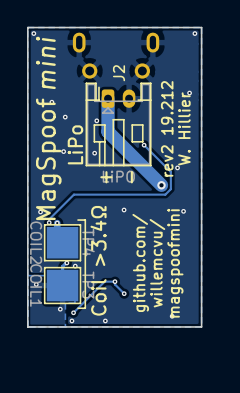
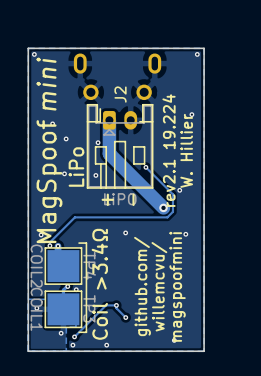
text: rev2 19.212 (167, 128) -> rev2.1 19.224 (169, 150)

